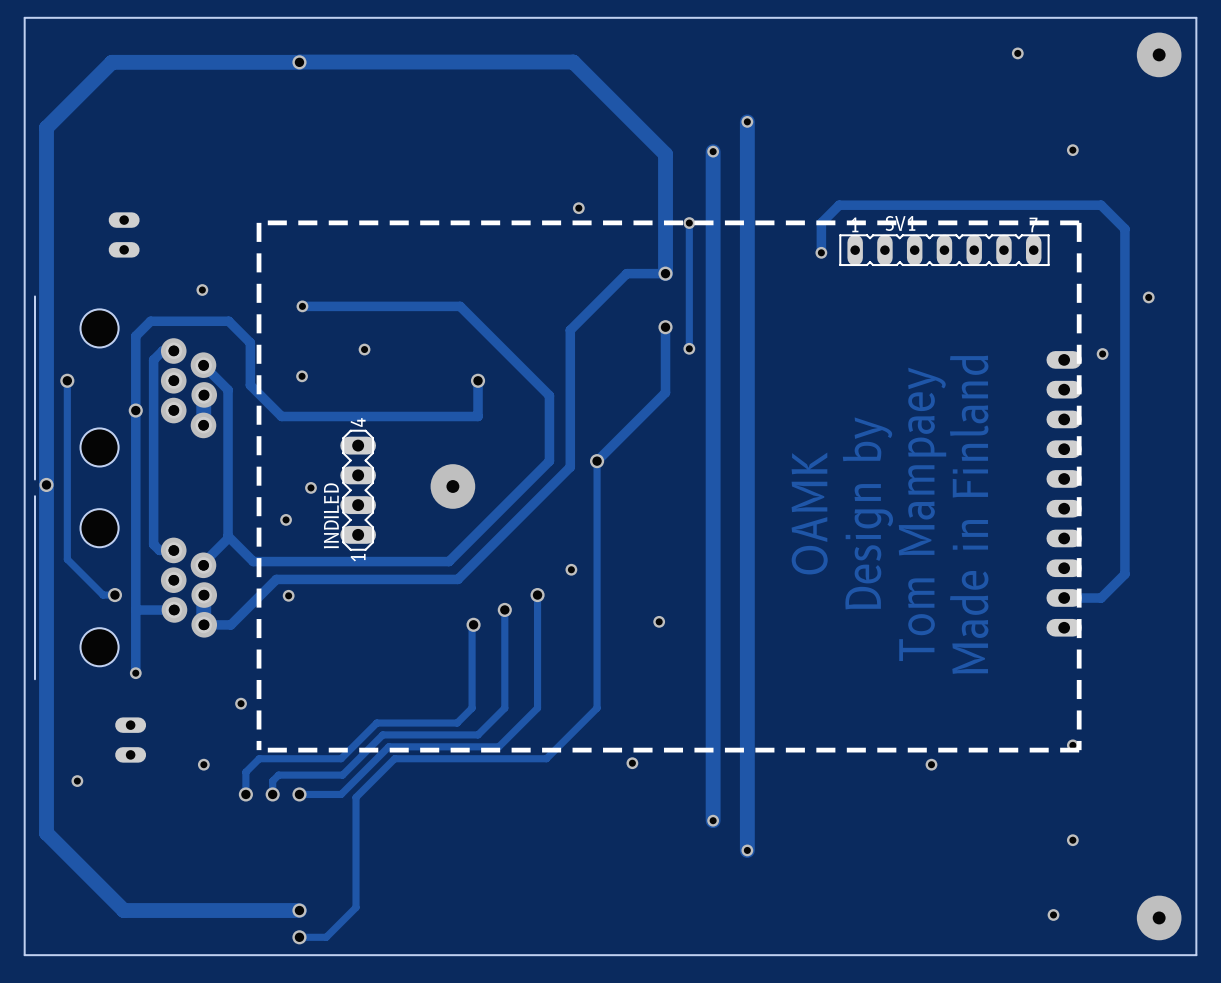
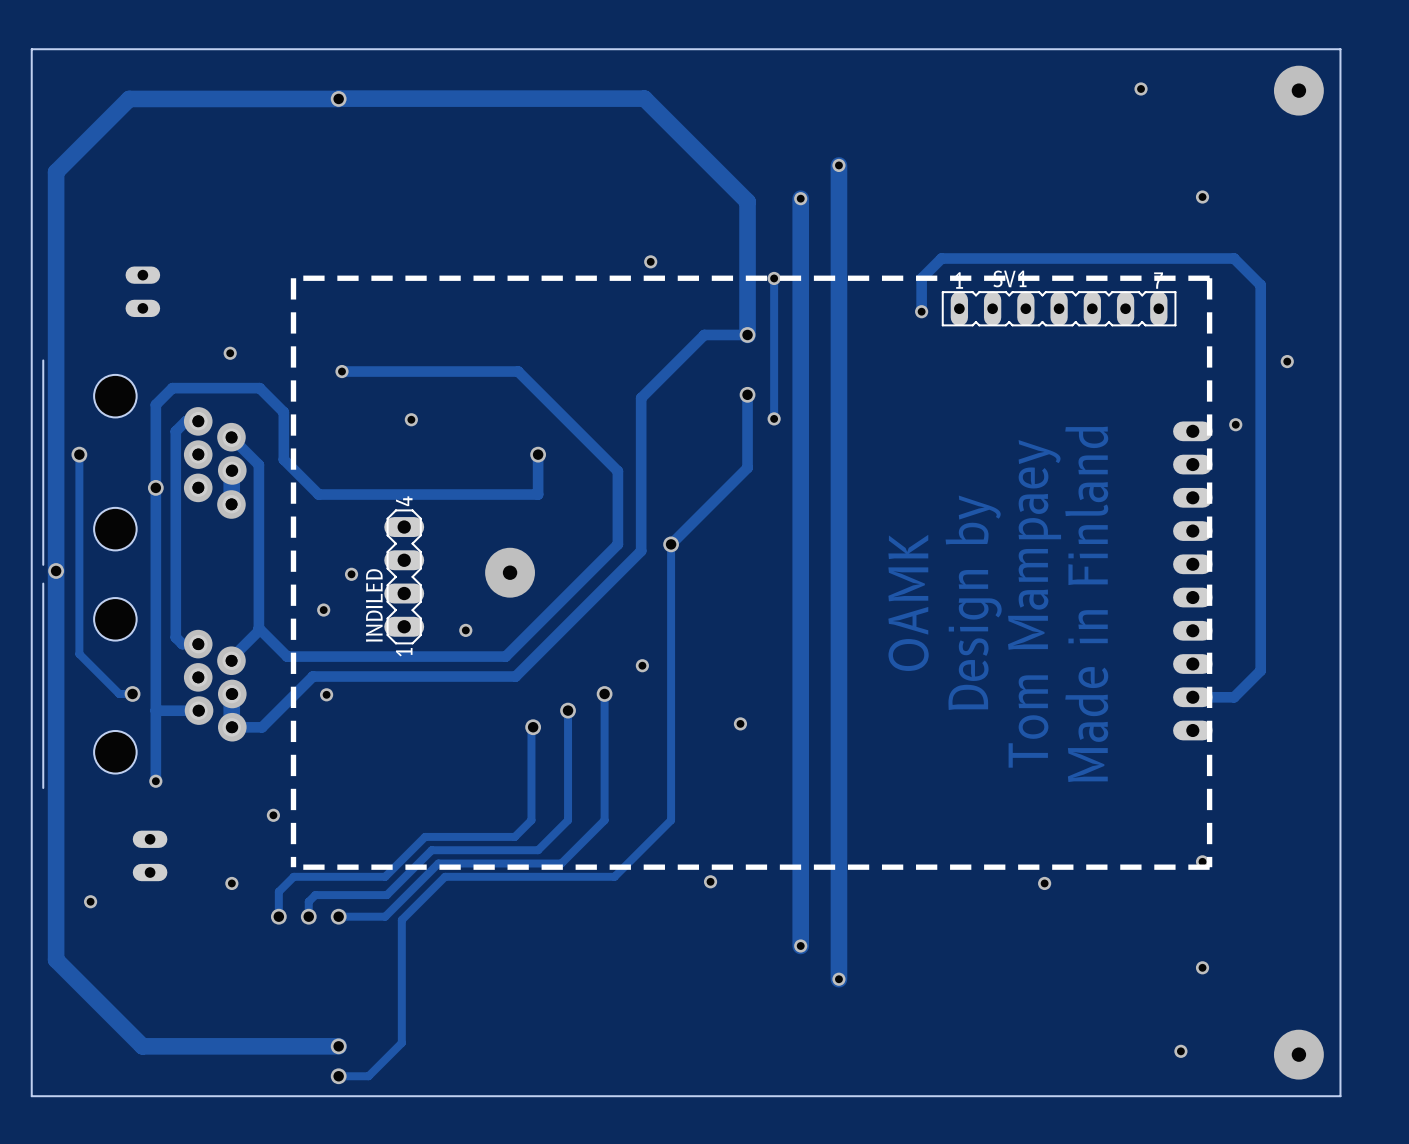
via: (302, 376) -> none
via: none -> (465, 630)

